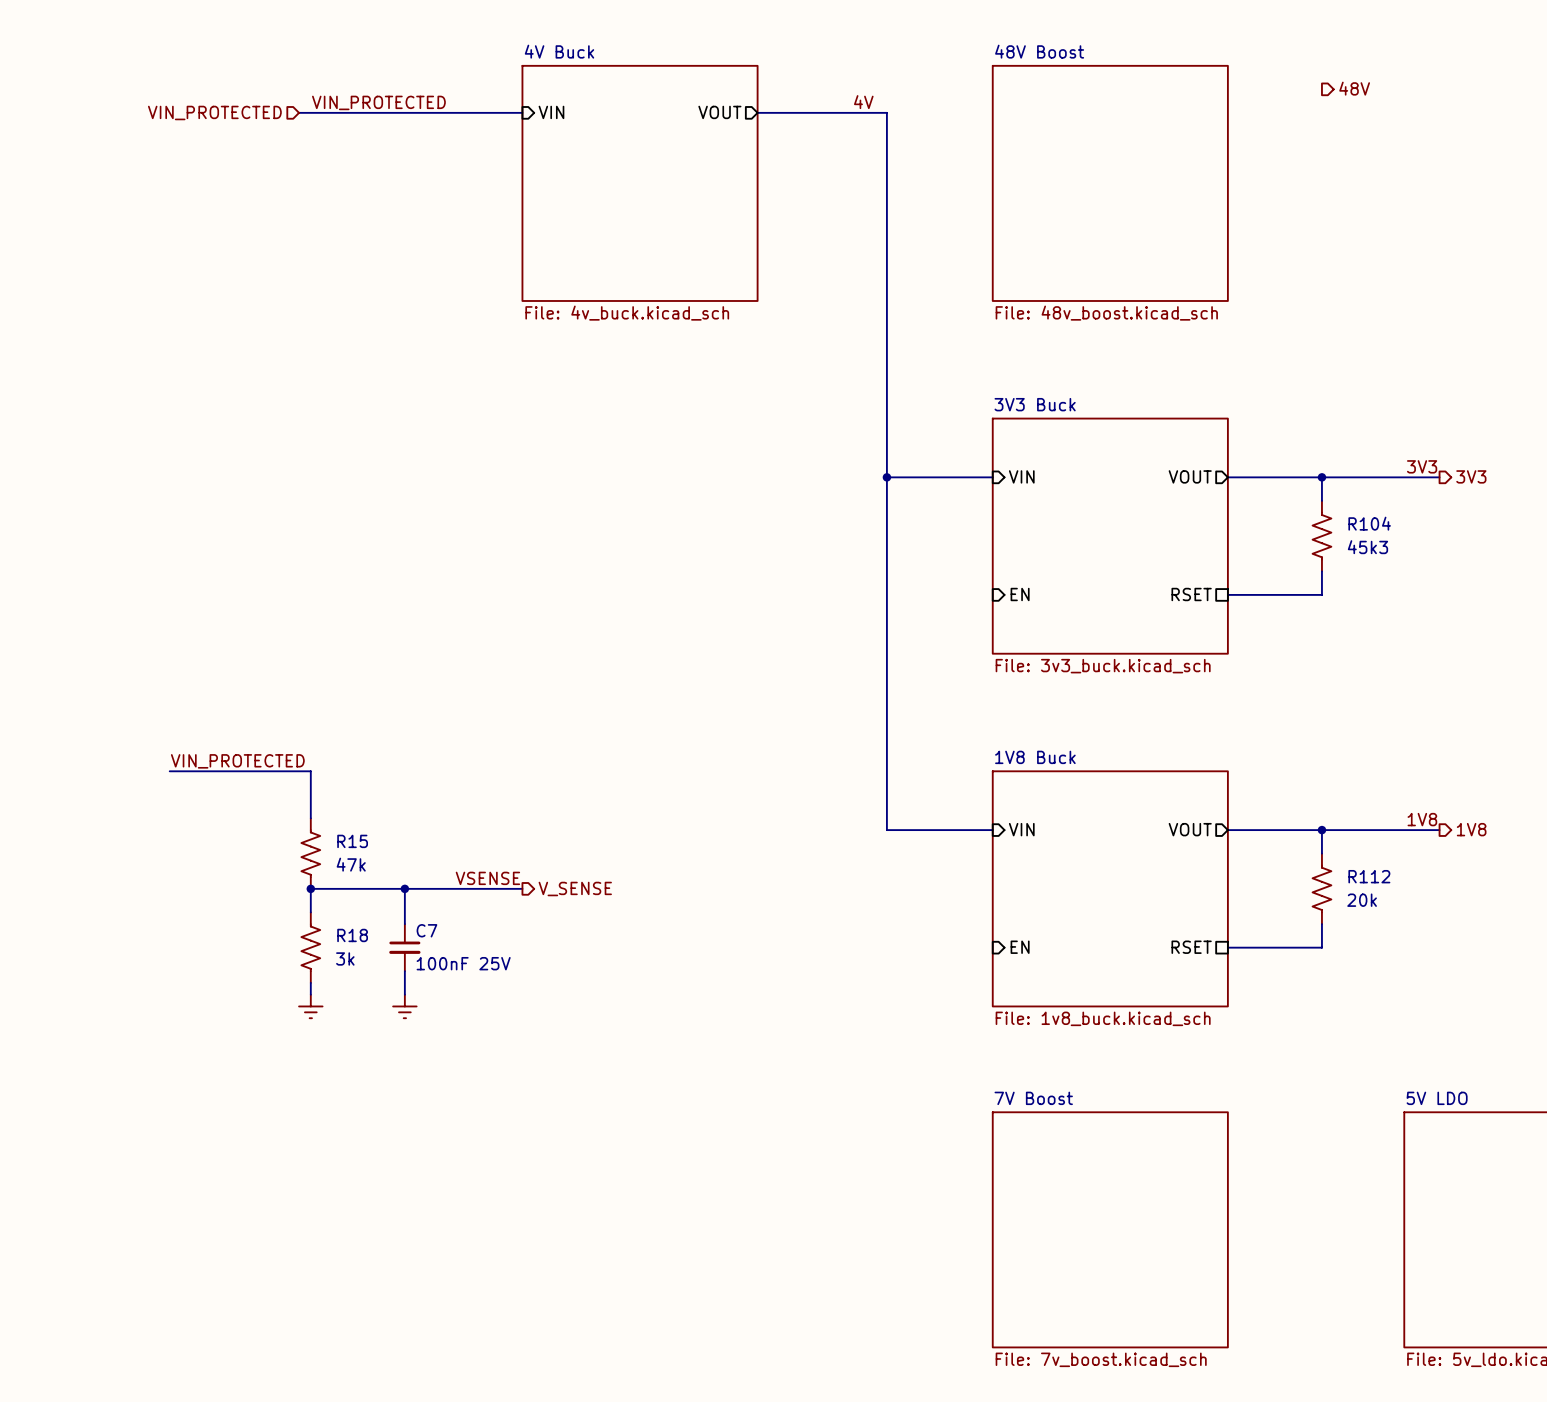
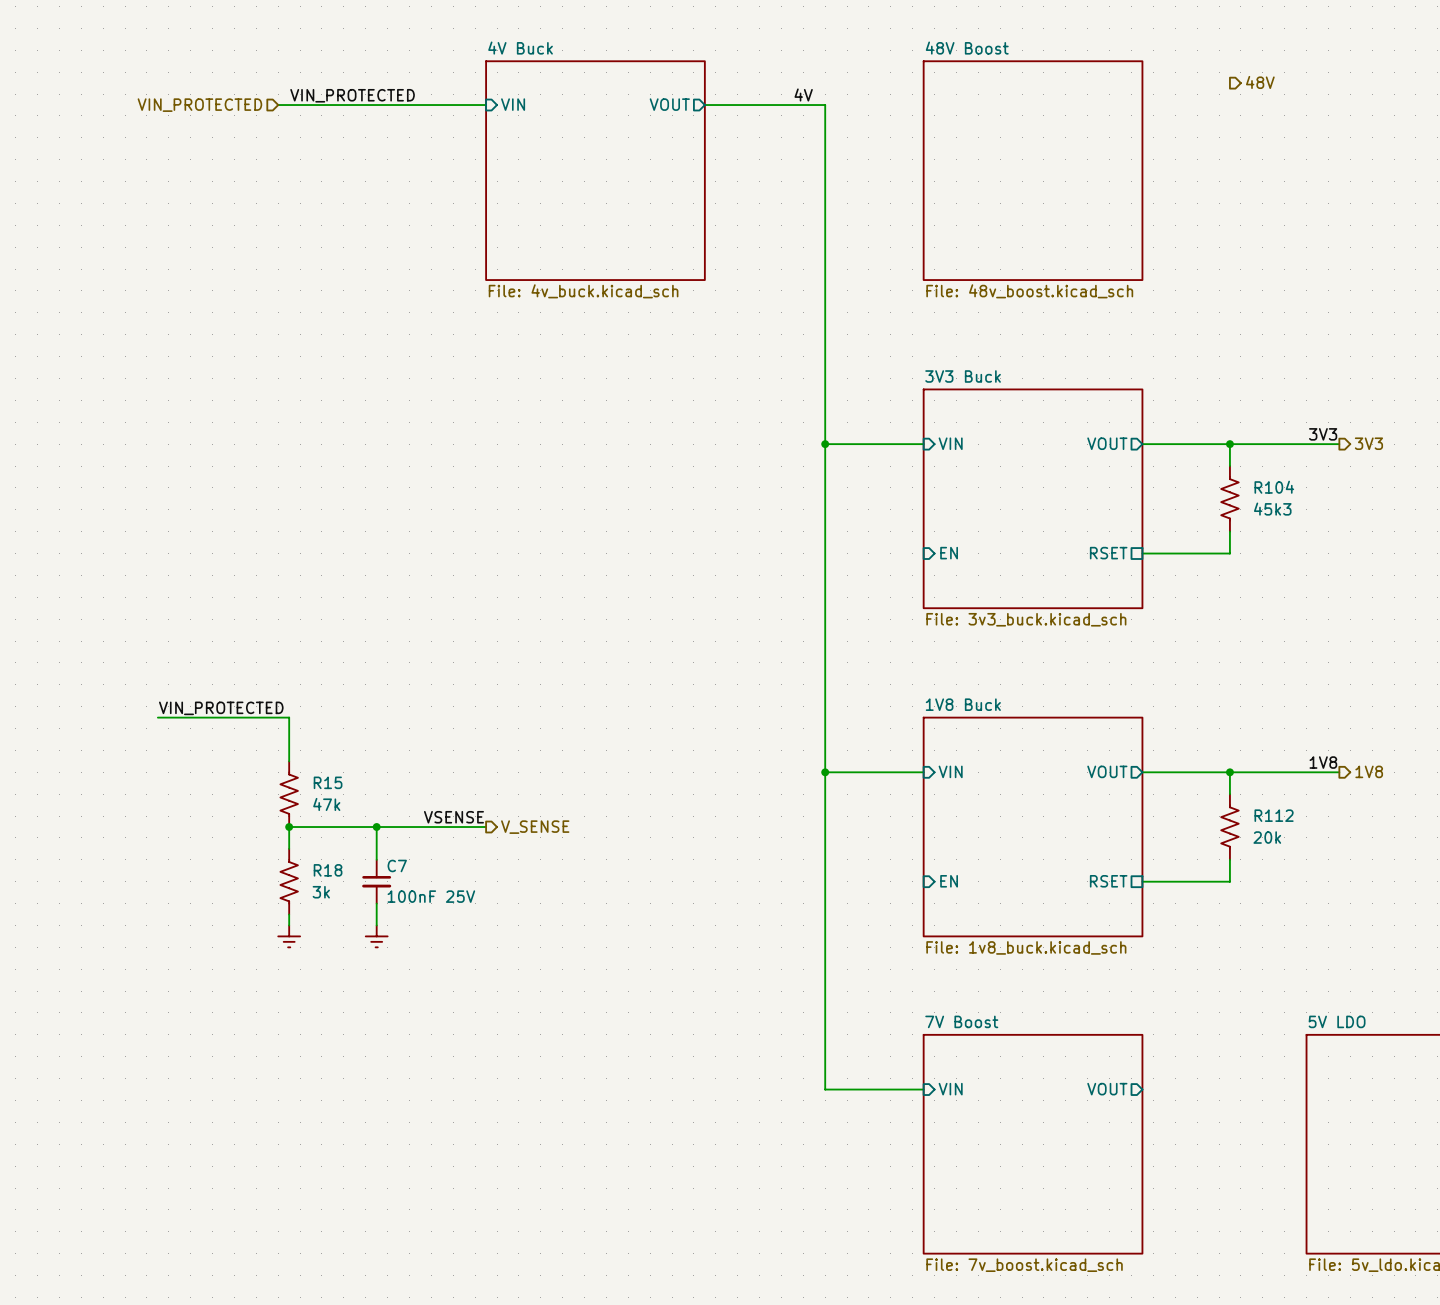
wire: none -> (825, 772) (825, 1089) (923, 1089)
junction: none -> (825, 772)
sheet pin: none -> VIN (950, 1089)
sheet pin: none -> VOUT (1107, 1089)

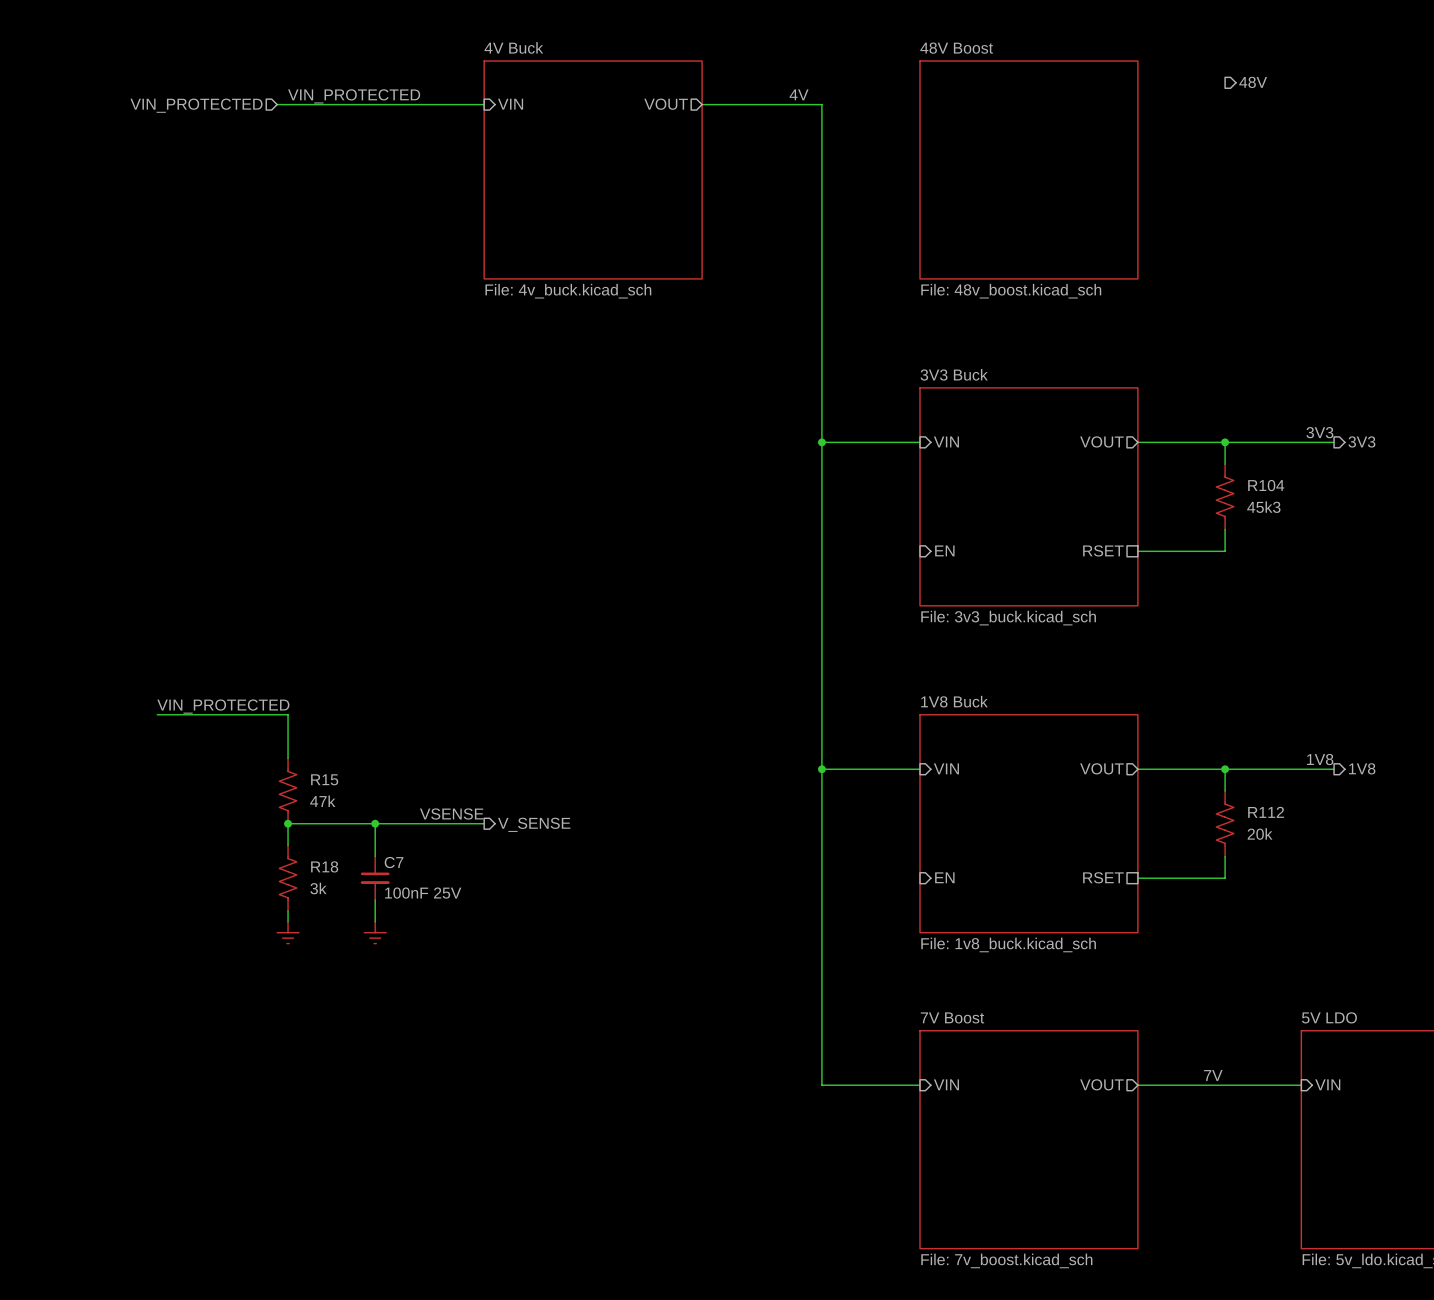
label: none -> 7V (1213, 1075)
wire: none -> (1137, 1085) (1301, 1085)
sheet pin: none -> VIN (1327, 1084)

